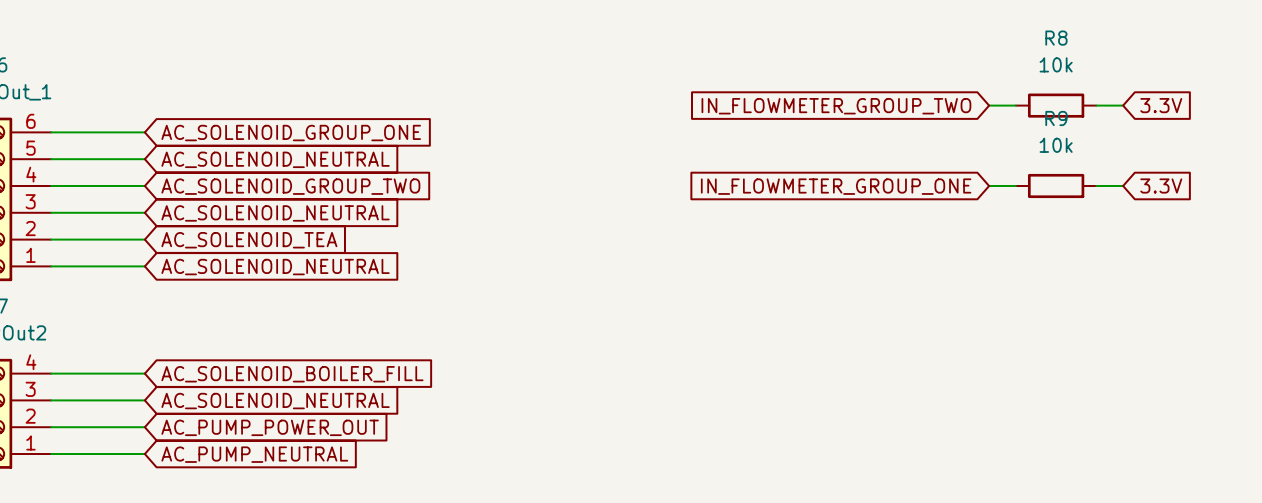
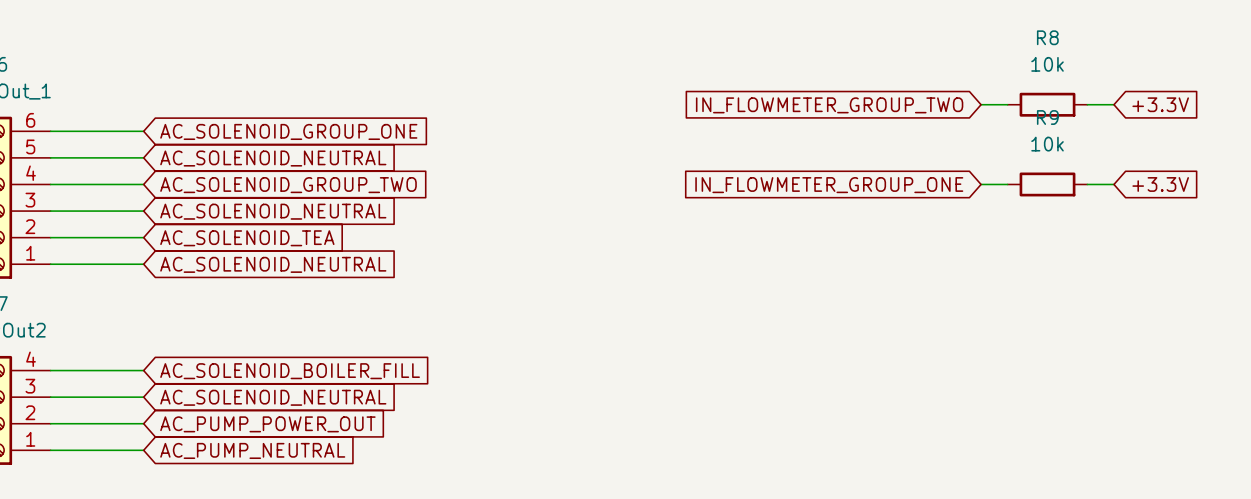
global label: 3.3V (1161, 105) -> +3.3V (1160, 104)
global label: 3.3V (1161, 185) -> +3.3V (1160, 184)

